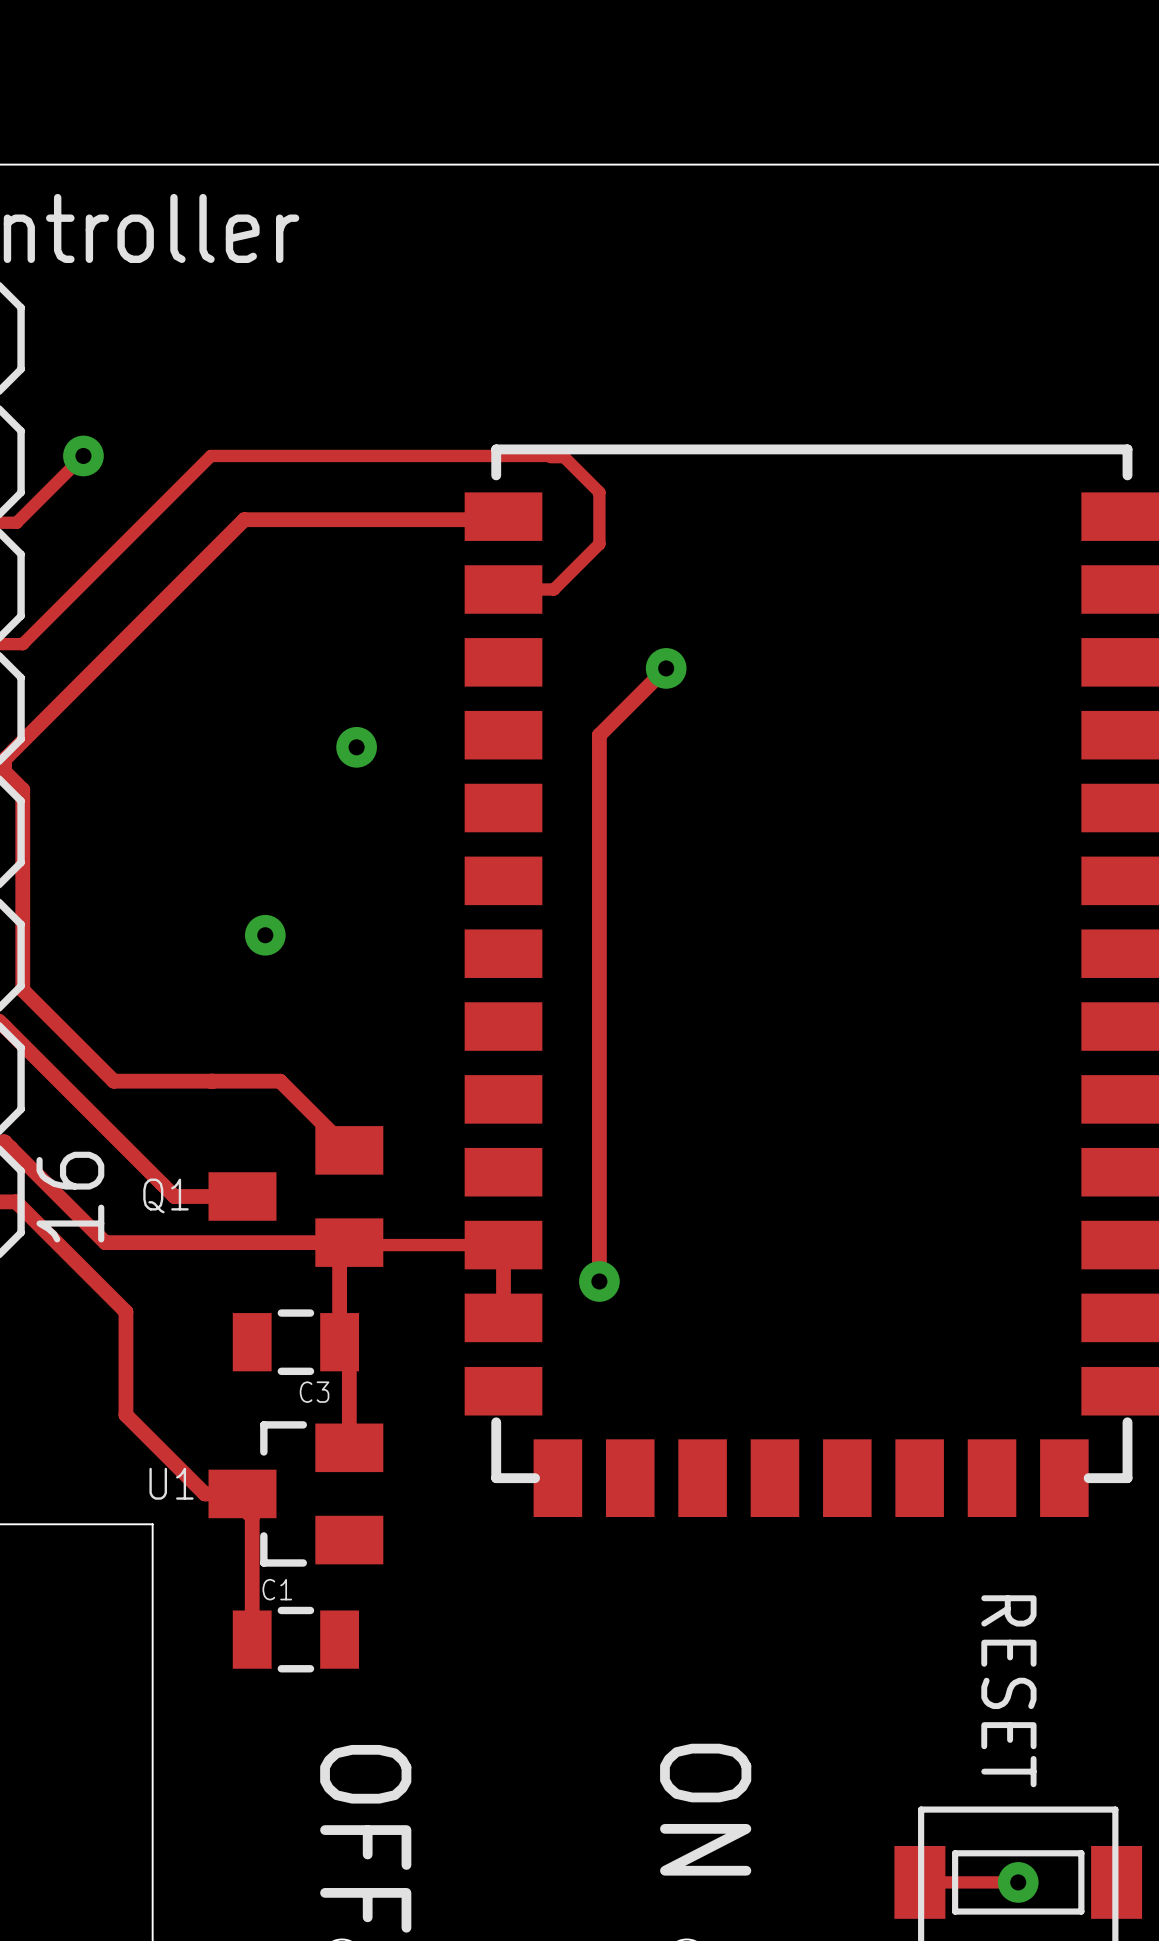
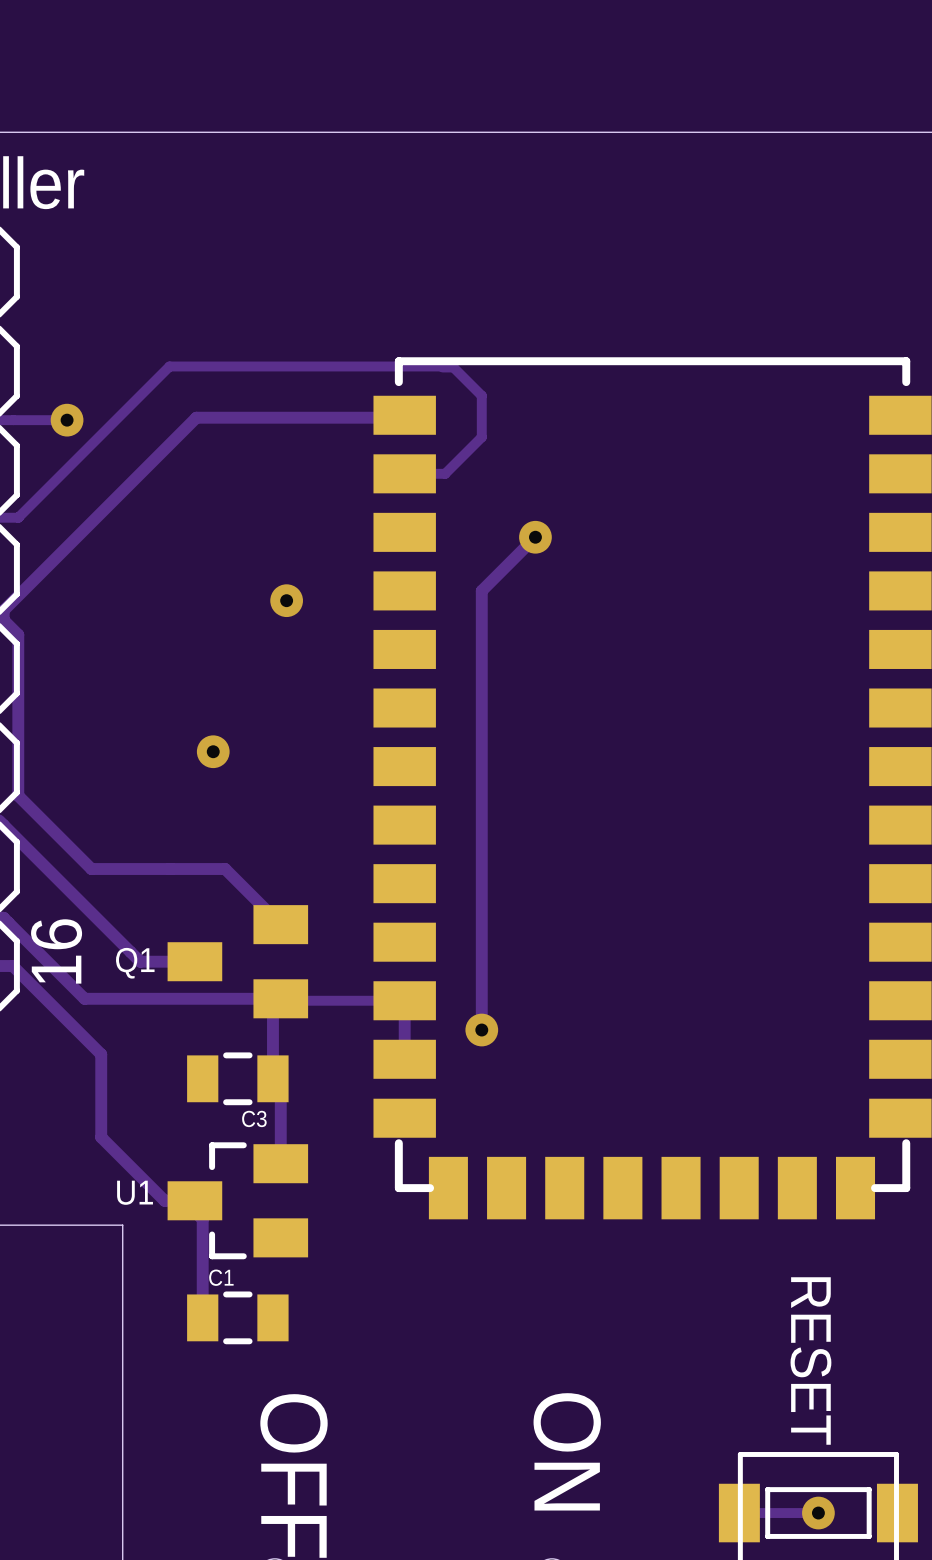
track: (83, 455) (16, 522) -> (67, 420) (13, 420)
via position: (83, 455) -> (67, 420)

